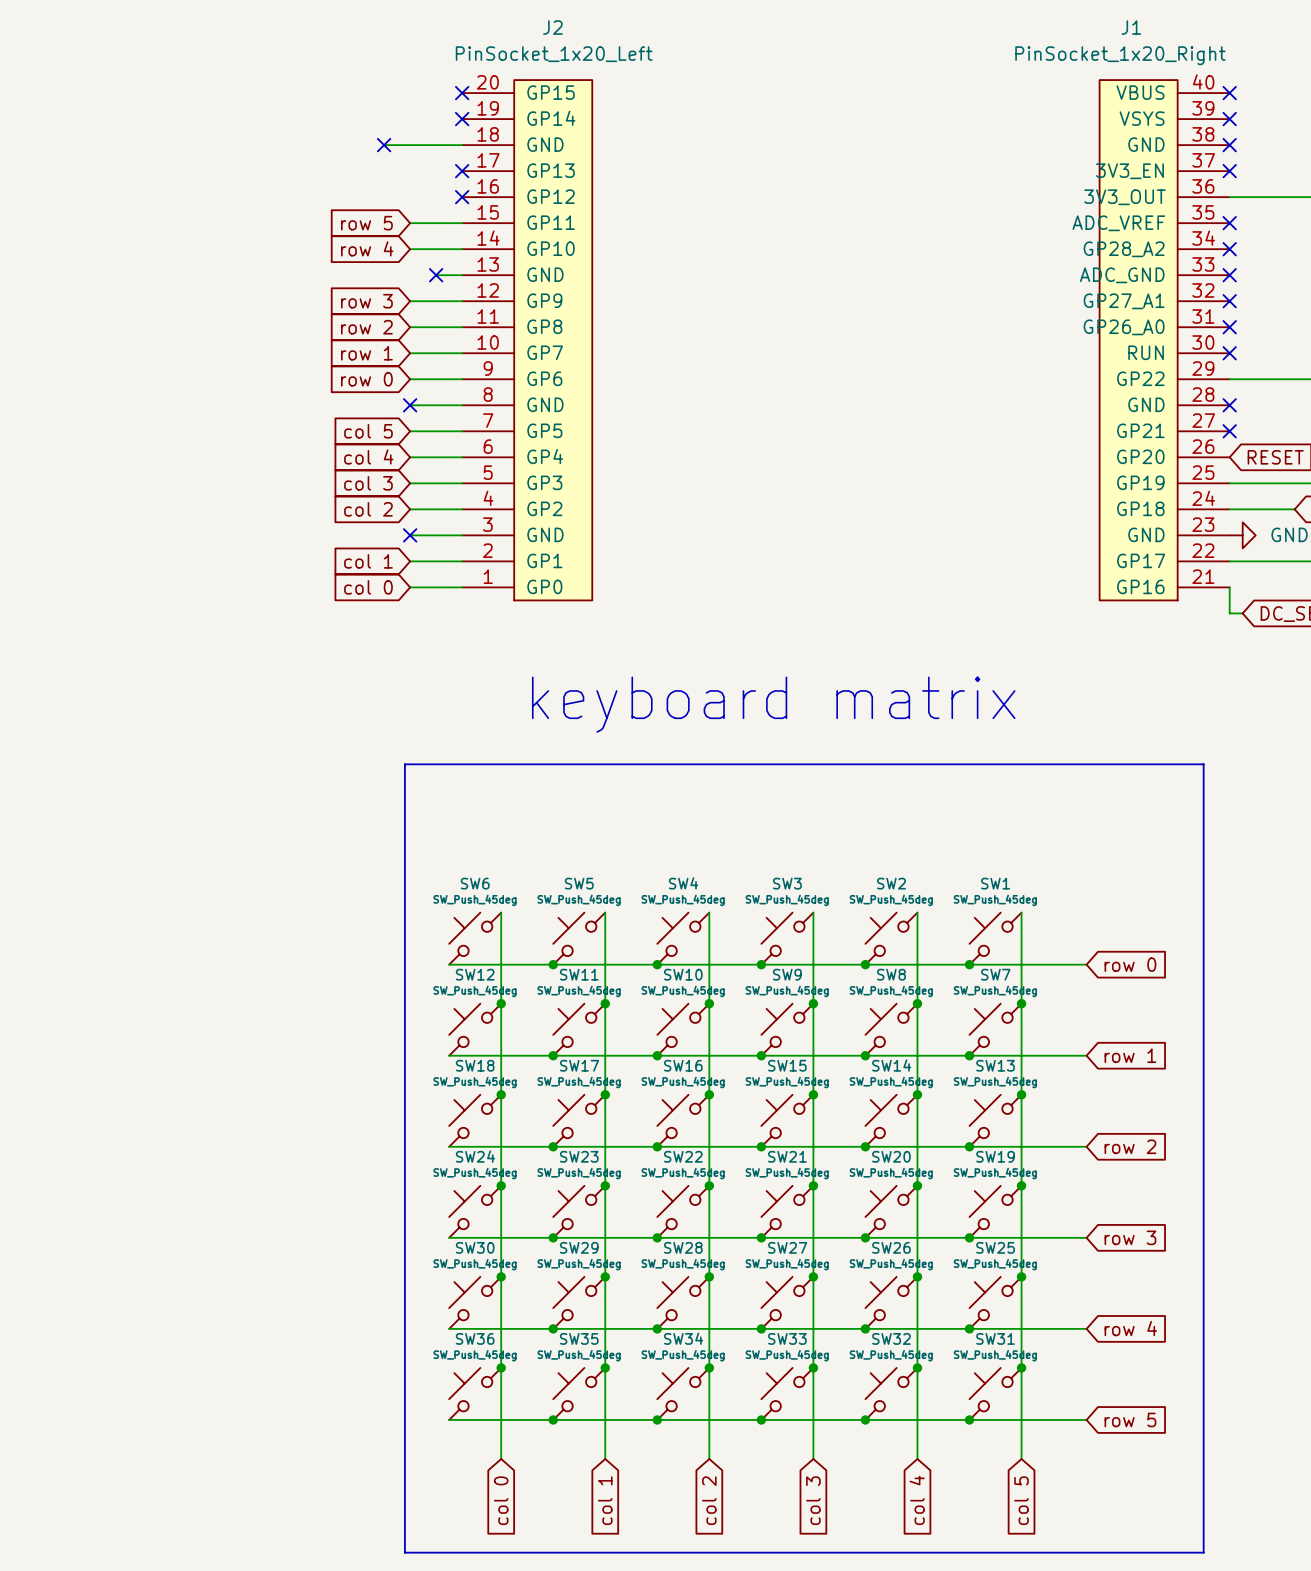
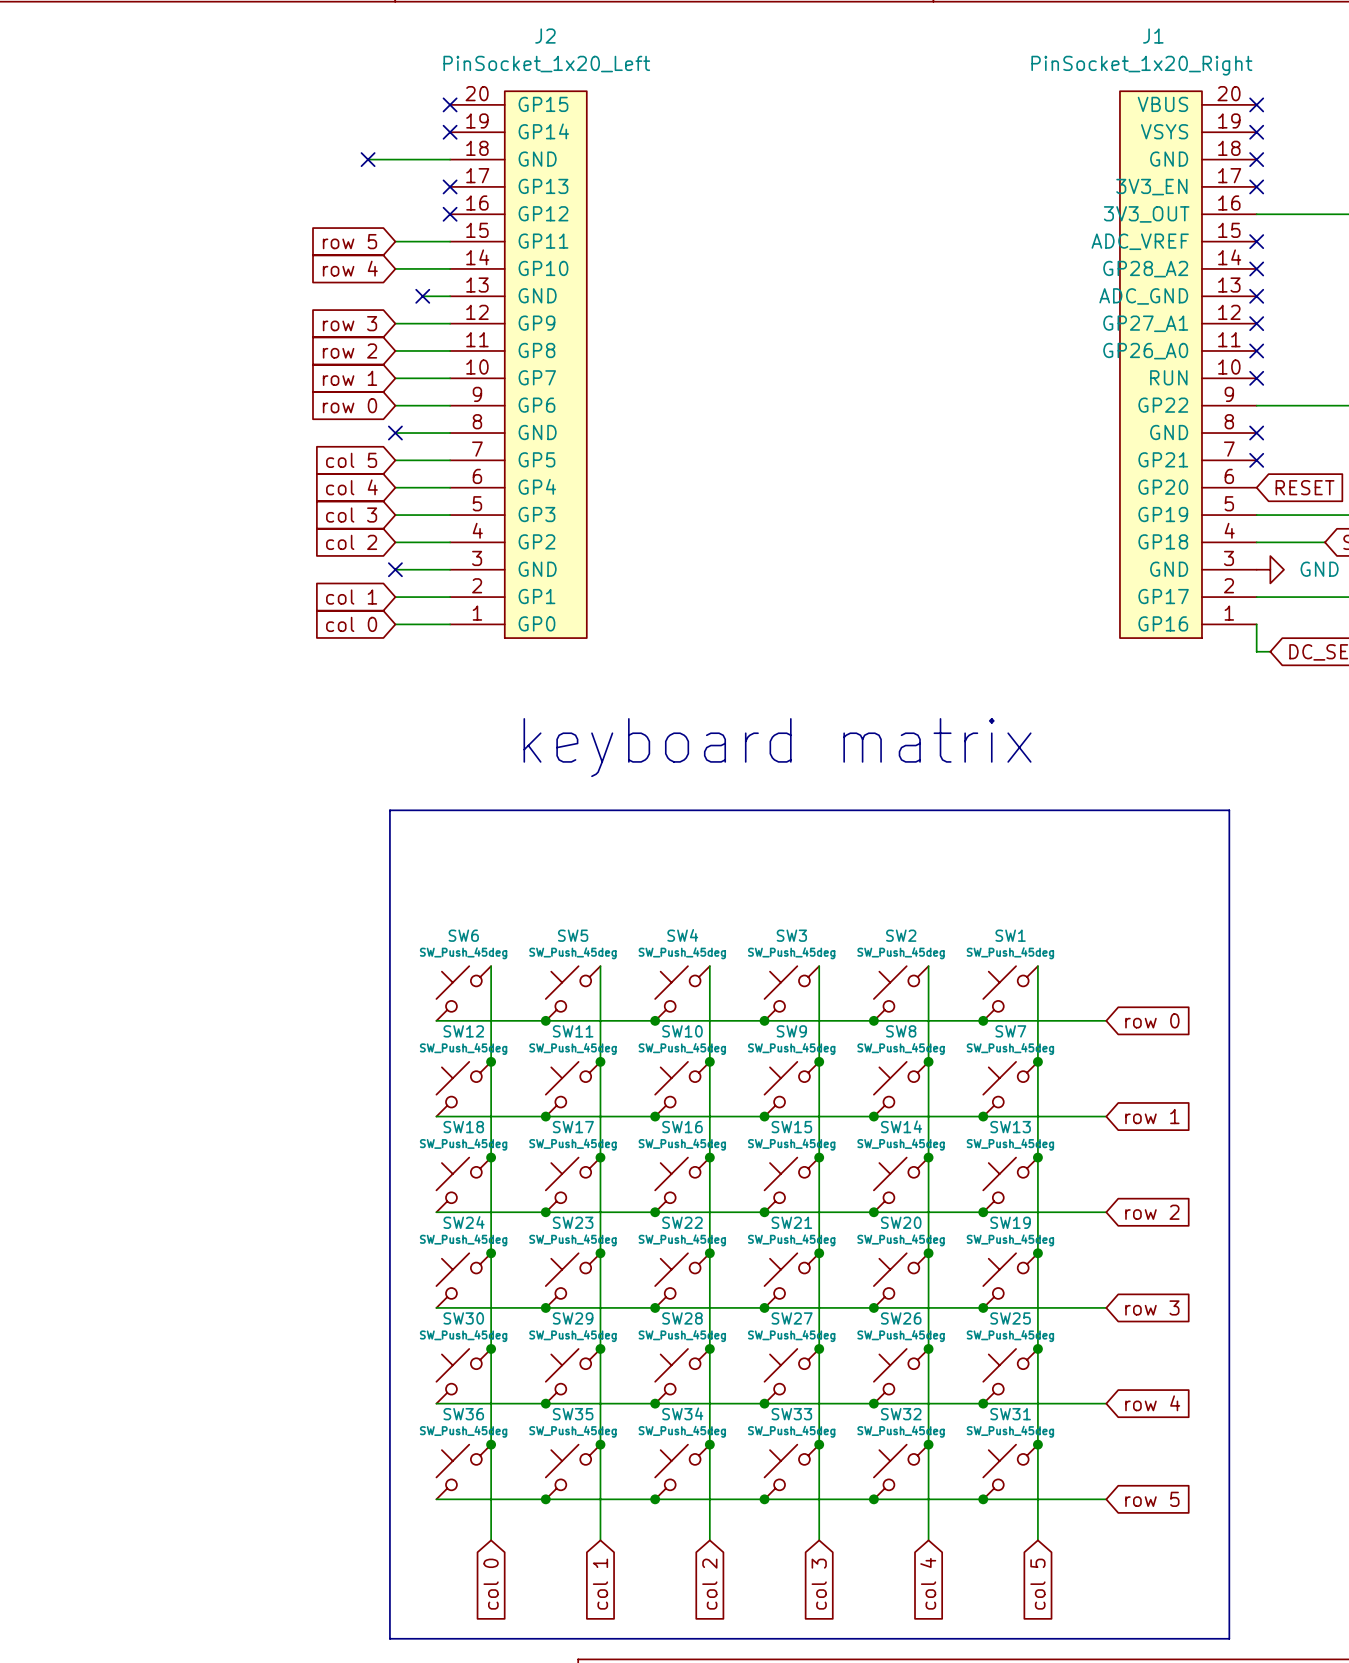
J1 symbol: [1099, 80, 1230, 601] -> [1119, 91, 1257, 639]

